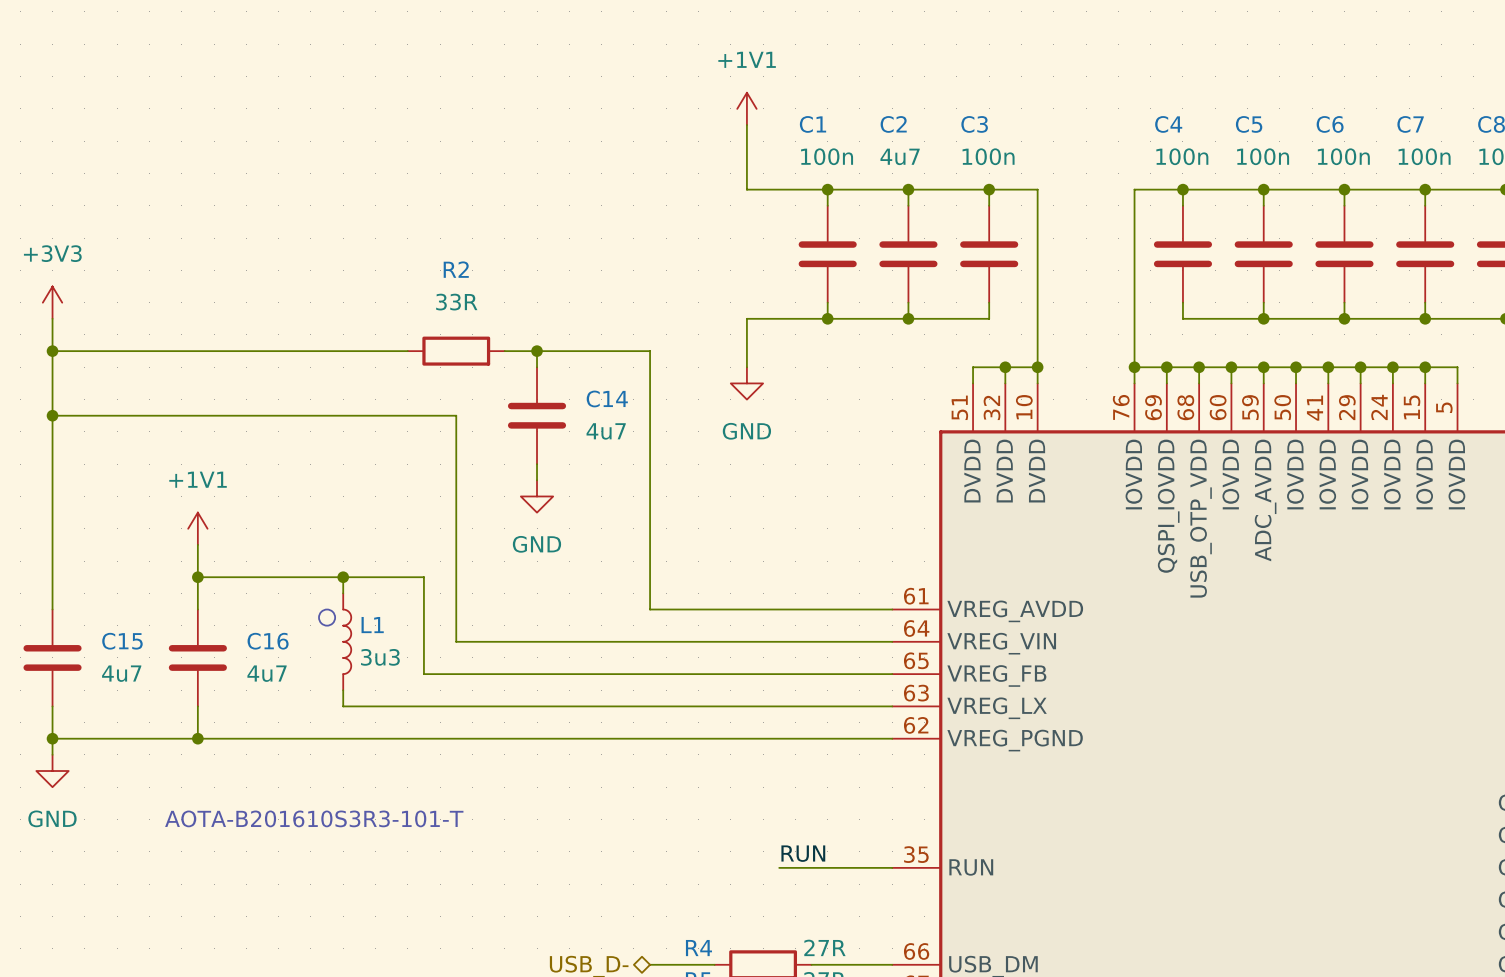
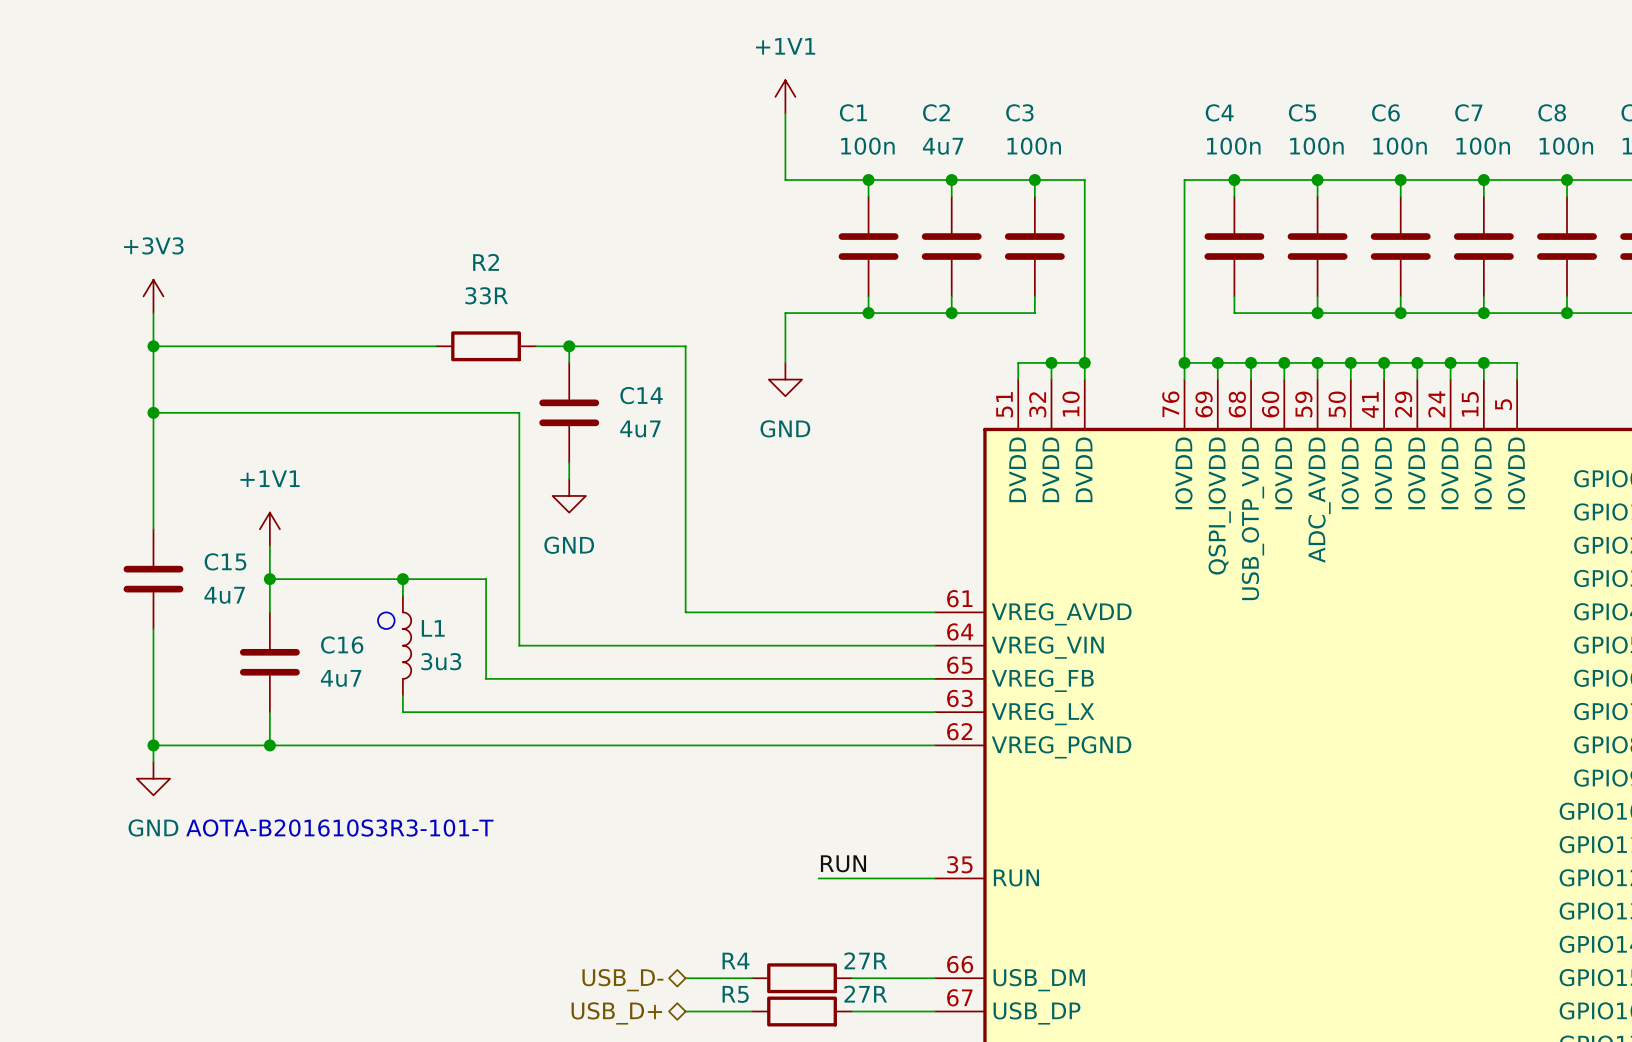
power symbol position: +3V3 (52, 302) -> +3V3 (153, 296)
wire: (52, 318) (52, 609) -> none
wire: none -> (153, 313) (153, 529)
wire: (52, 351) (133, 351) -> none
junction: (52, 351) -> none
junction: none -> (153, 346)
wire: (52, 415) (133, 415) -> none
junction: (52, 415) -> none
junction: none -> (153, 412)
wire: (456, 415) (456, 577) -> (486, 412) (519, 412) (519, 645)
power symbol position: +1V1 (197, 528) -> +1V1 (269, 529)
wire: (197, 544) (197, 609) -> (269, 545) (269, 612)
wire: (197, 577) (246, 577) -> none
junction: (197, 577) -> none
junction: none -> (269, 579)
wire: (343, 577) (343, 593) -> (402, 579) (402, 595)
junction position: (343, 577) -> (402, 579)
wire: (423, 577) (423, 674) (456, 674) -> (452, 579) (486, 579)
drawing position: (327, 617) -> (386, 620)
wire: none -> (153, 629) (153, 762)
L1 position: (347, 641) -> (407, 645)
wire: (456, 641) (488, 641) -> (486, 645) (486, 678)
C15 position: (52, 657) -> (153, 579)
C16 position: (197, 657) -> (269, 662)
wire: (343, 690) (343, 706) (375, 706) -> (402, 695) (402, 712)
wire: (52, 706) (52, 754) -> none
wire: (197, 706) (197, 738) -> (269, 712) (269, 745)
wire: (52, 738) (133, 738) -> none
junction: (52, 738) -> none
junction: none -> (153, 745)
junction: (197, 738) -> none
junction: none -> (269, 745)
power symbol position: GND (52, 771) -> GND (153, 778)

